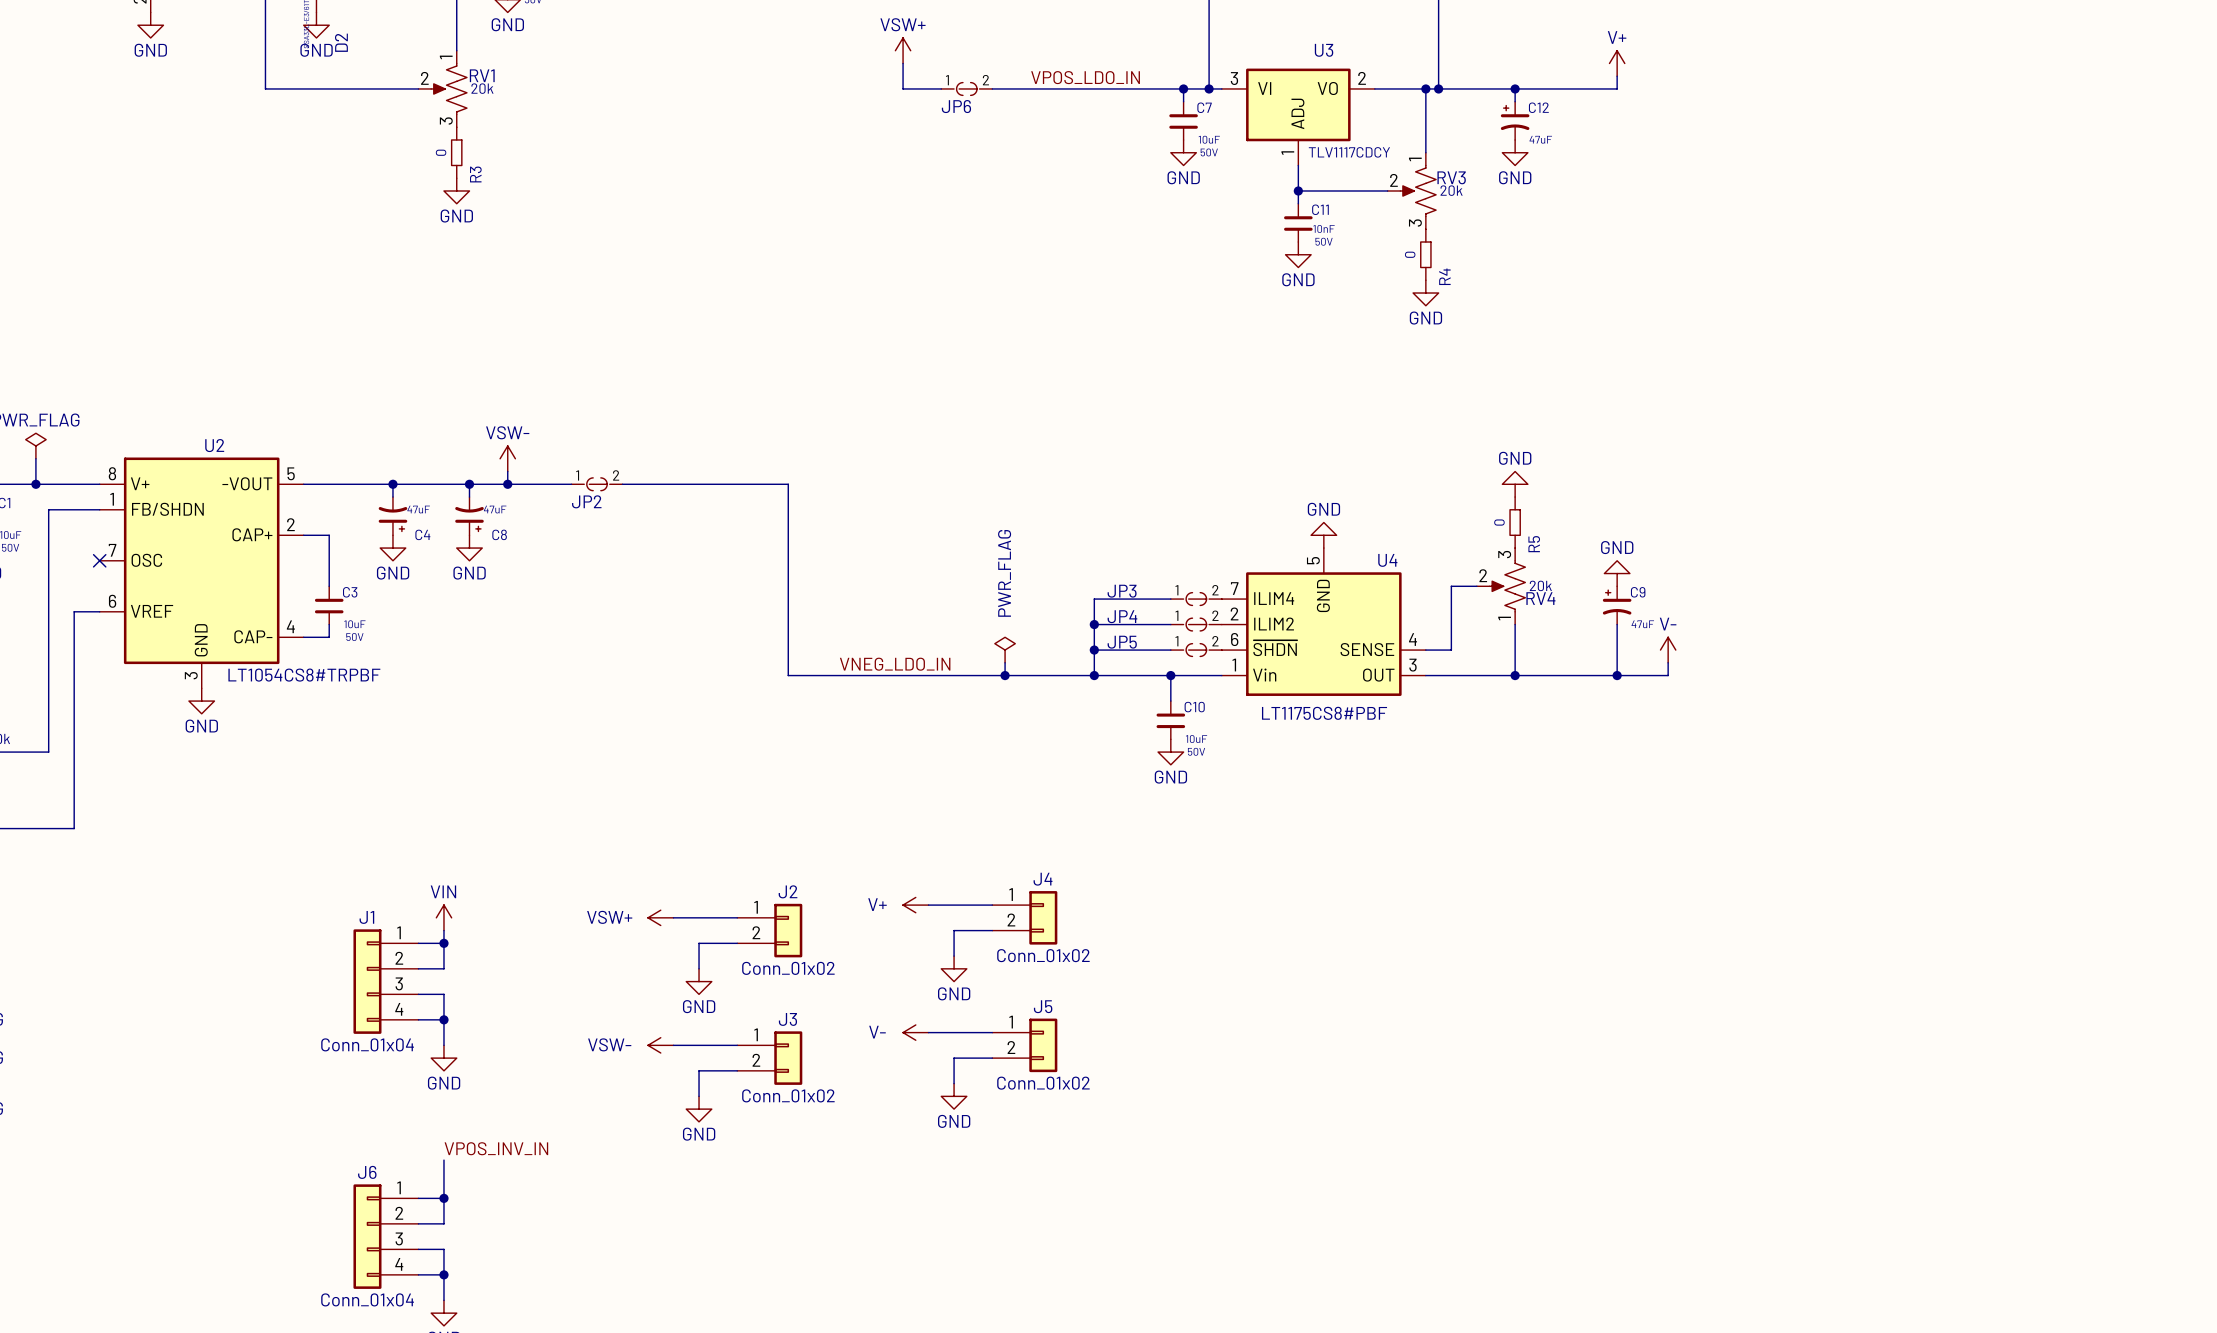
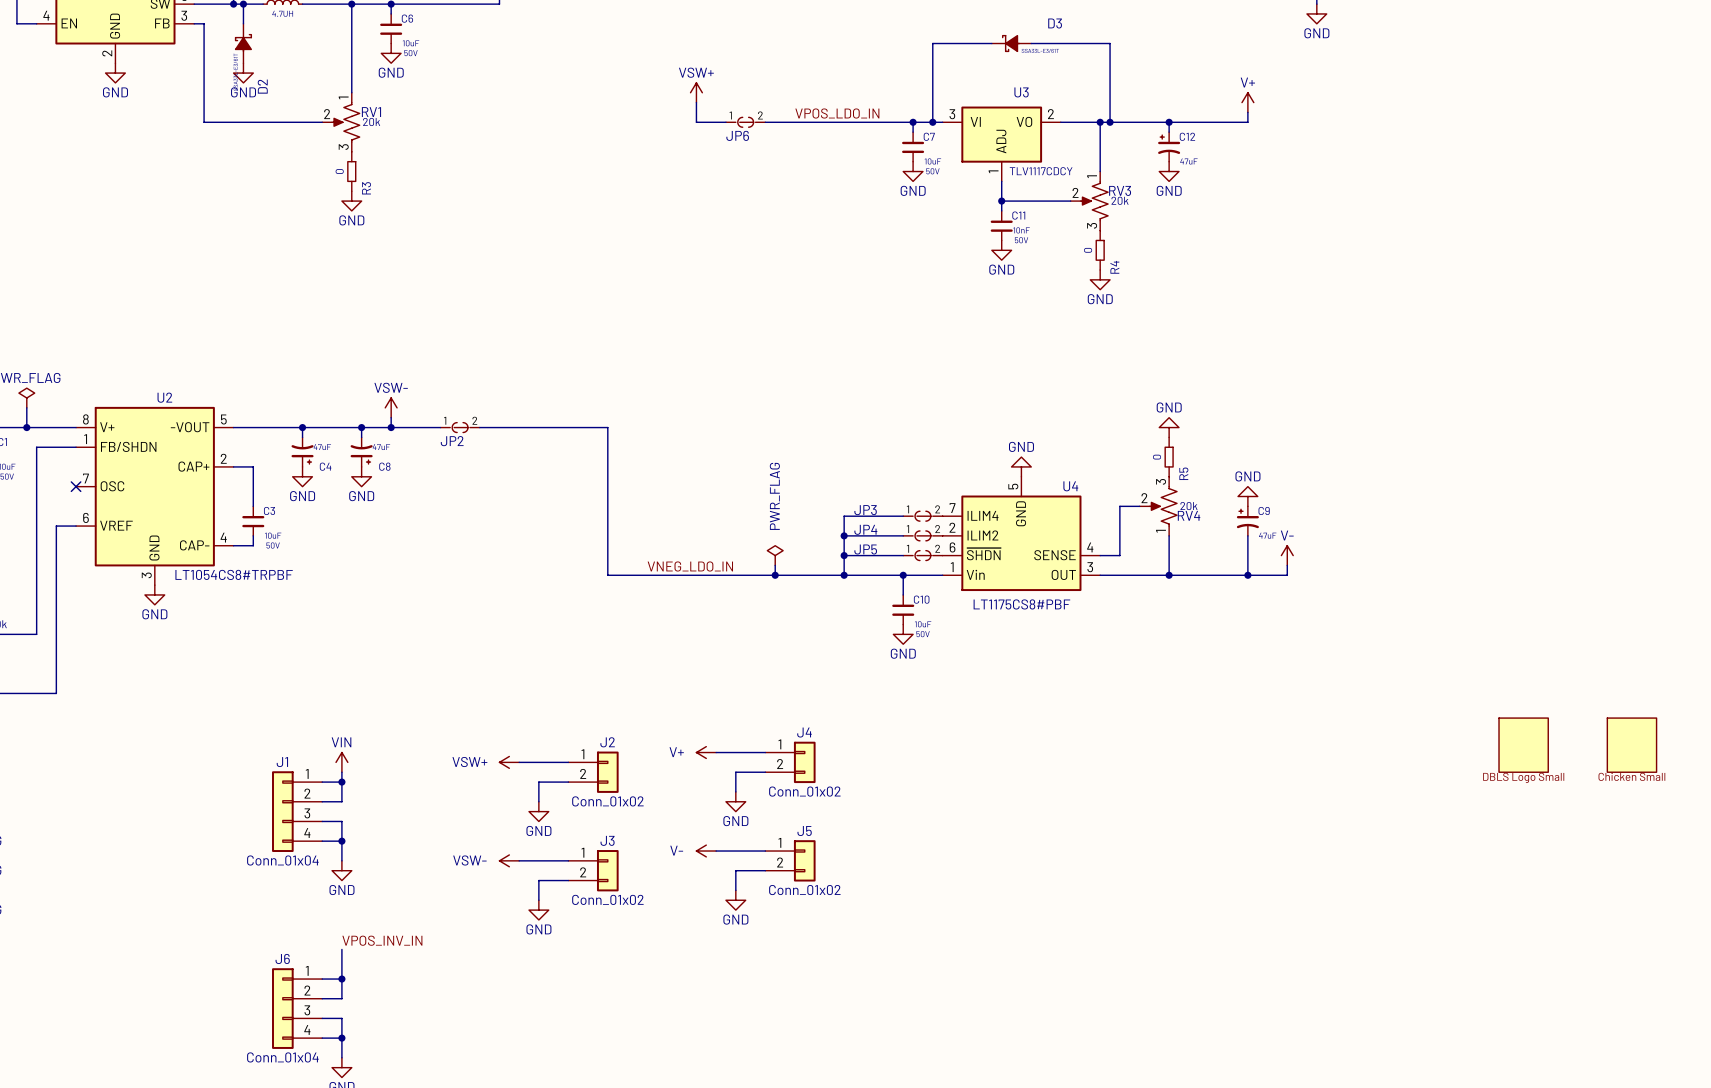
part: none -> (1523, 745)
part: none -> (1631, 745)

